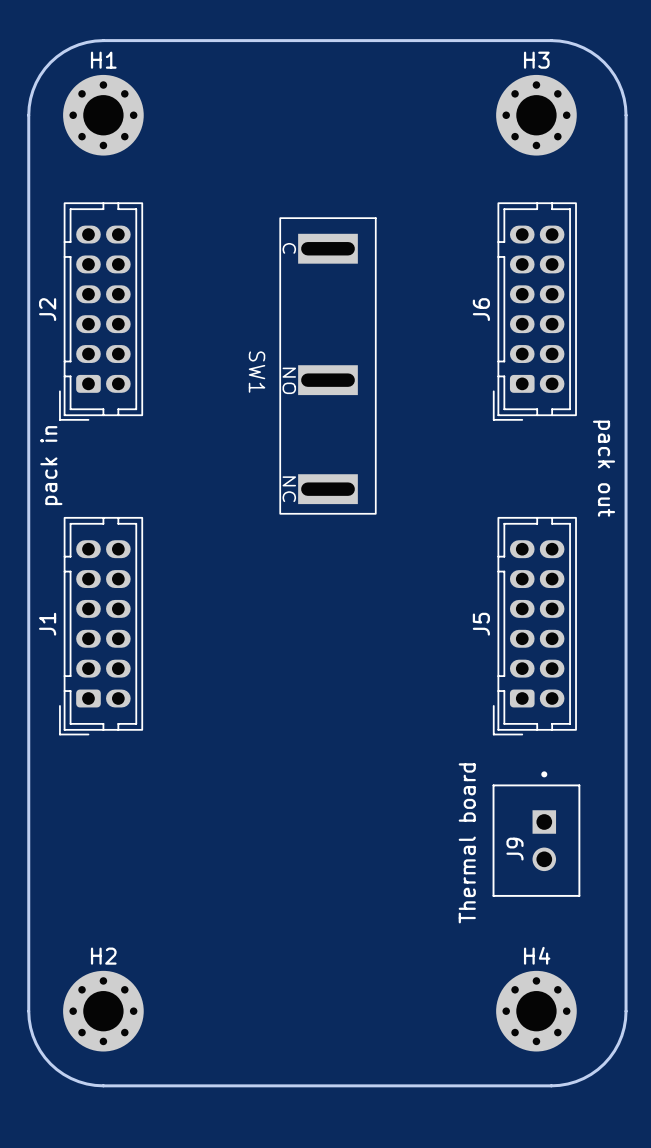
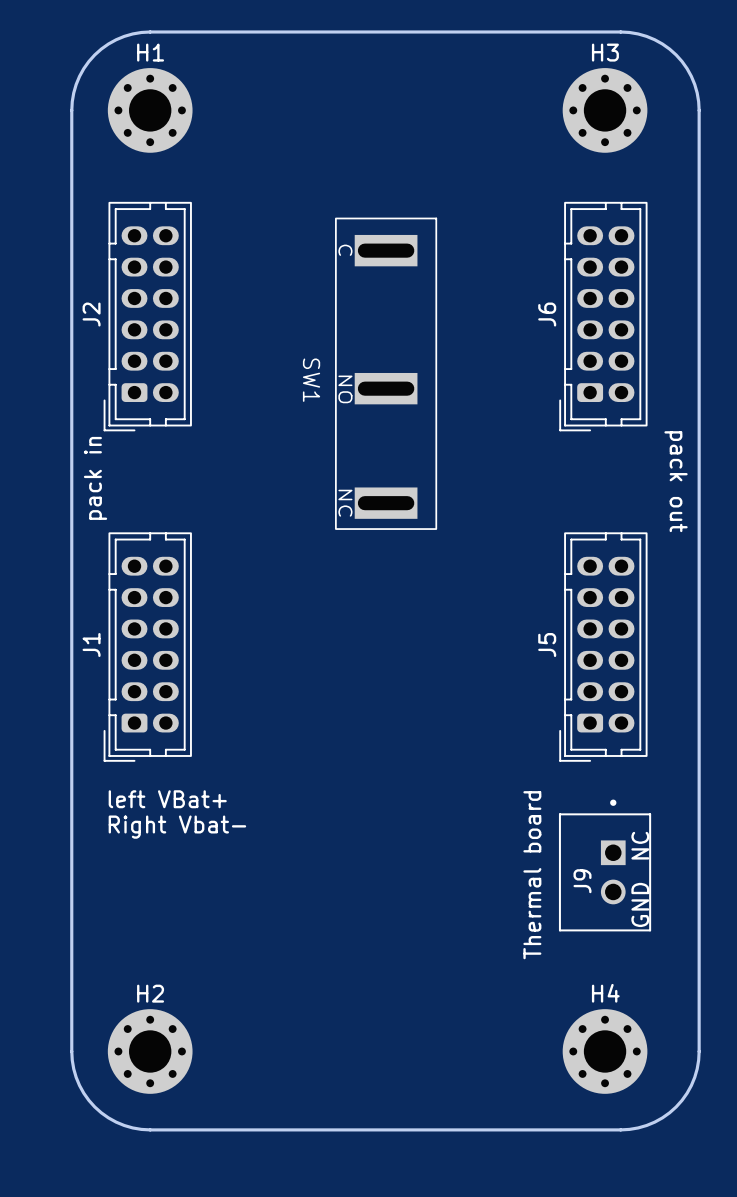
text: none -> left VBat+ (167, 799)
text: none -> Right Vbat- (177, 827)
text: none -> NC (640, 845)
text: none -> GND (640, 904)

